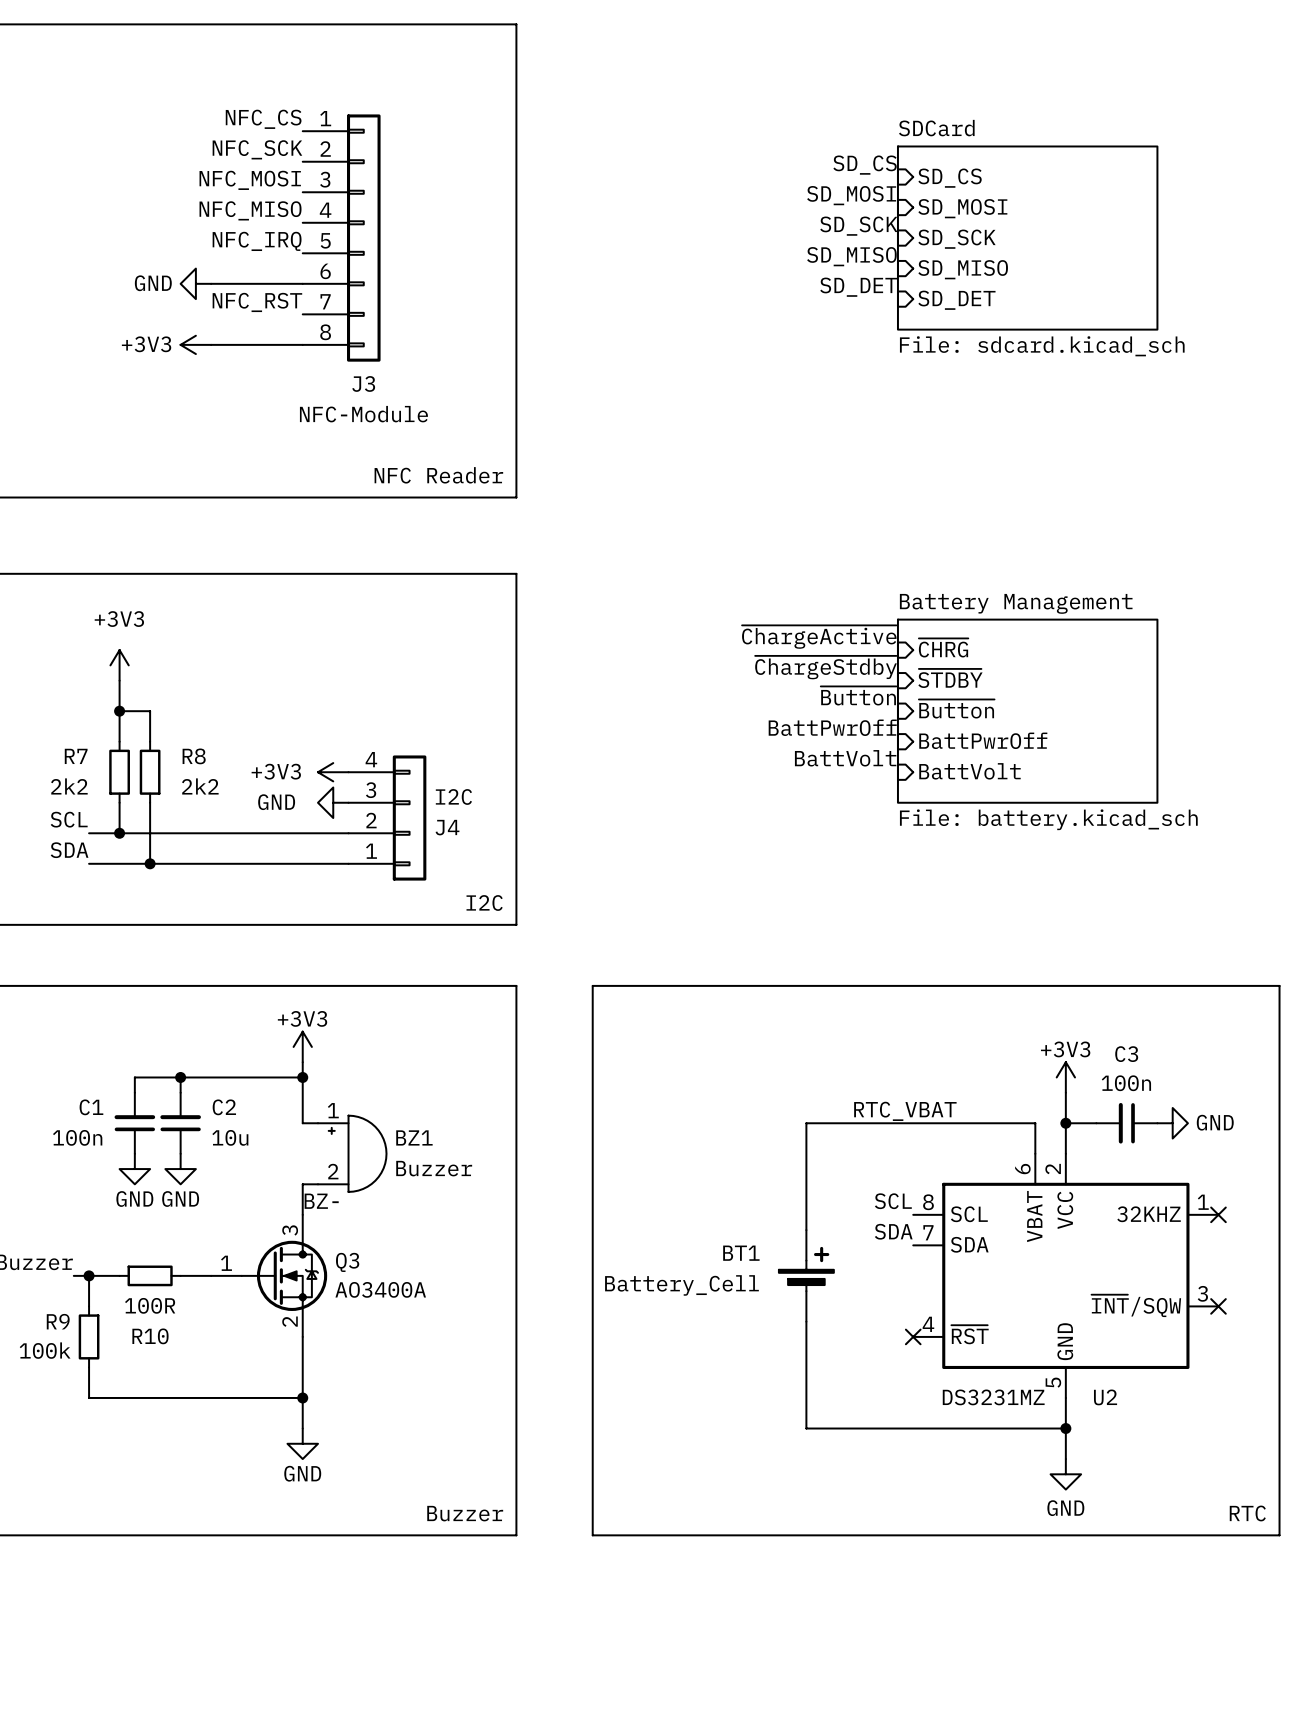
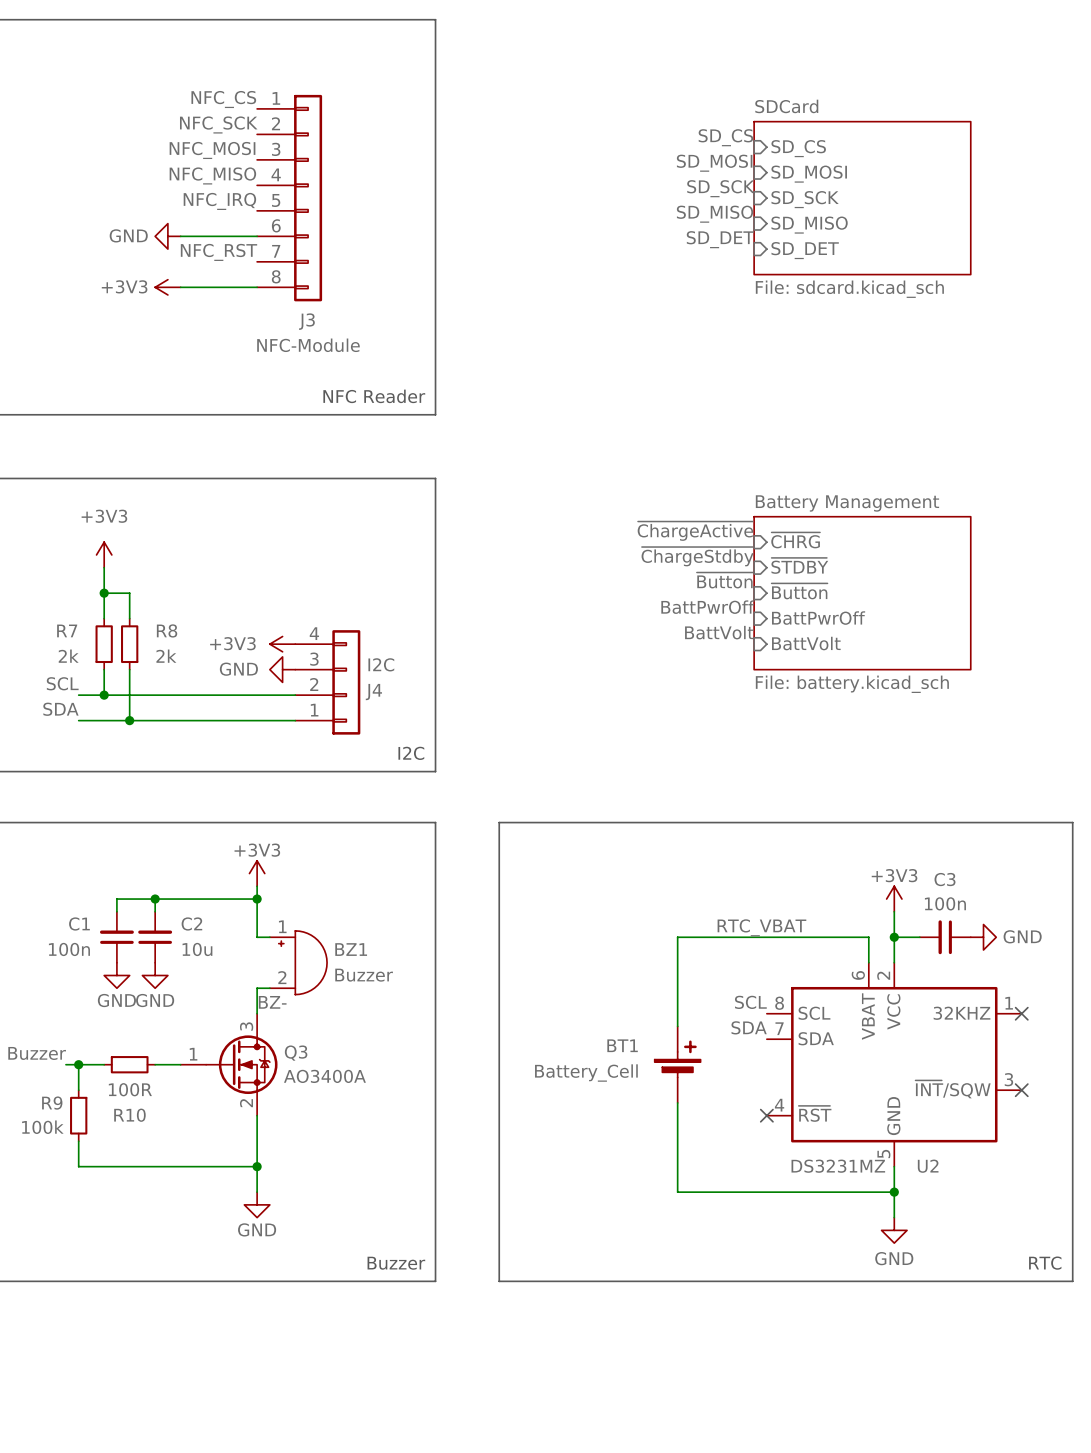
R7 value: 2k2 (69, 786) -> 2k (68, 656)
R8 value: 2k2 (200, 786) -> 2k (166, 656)

